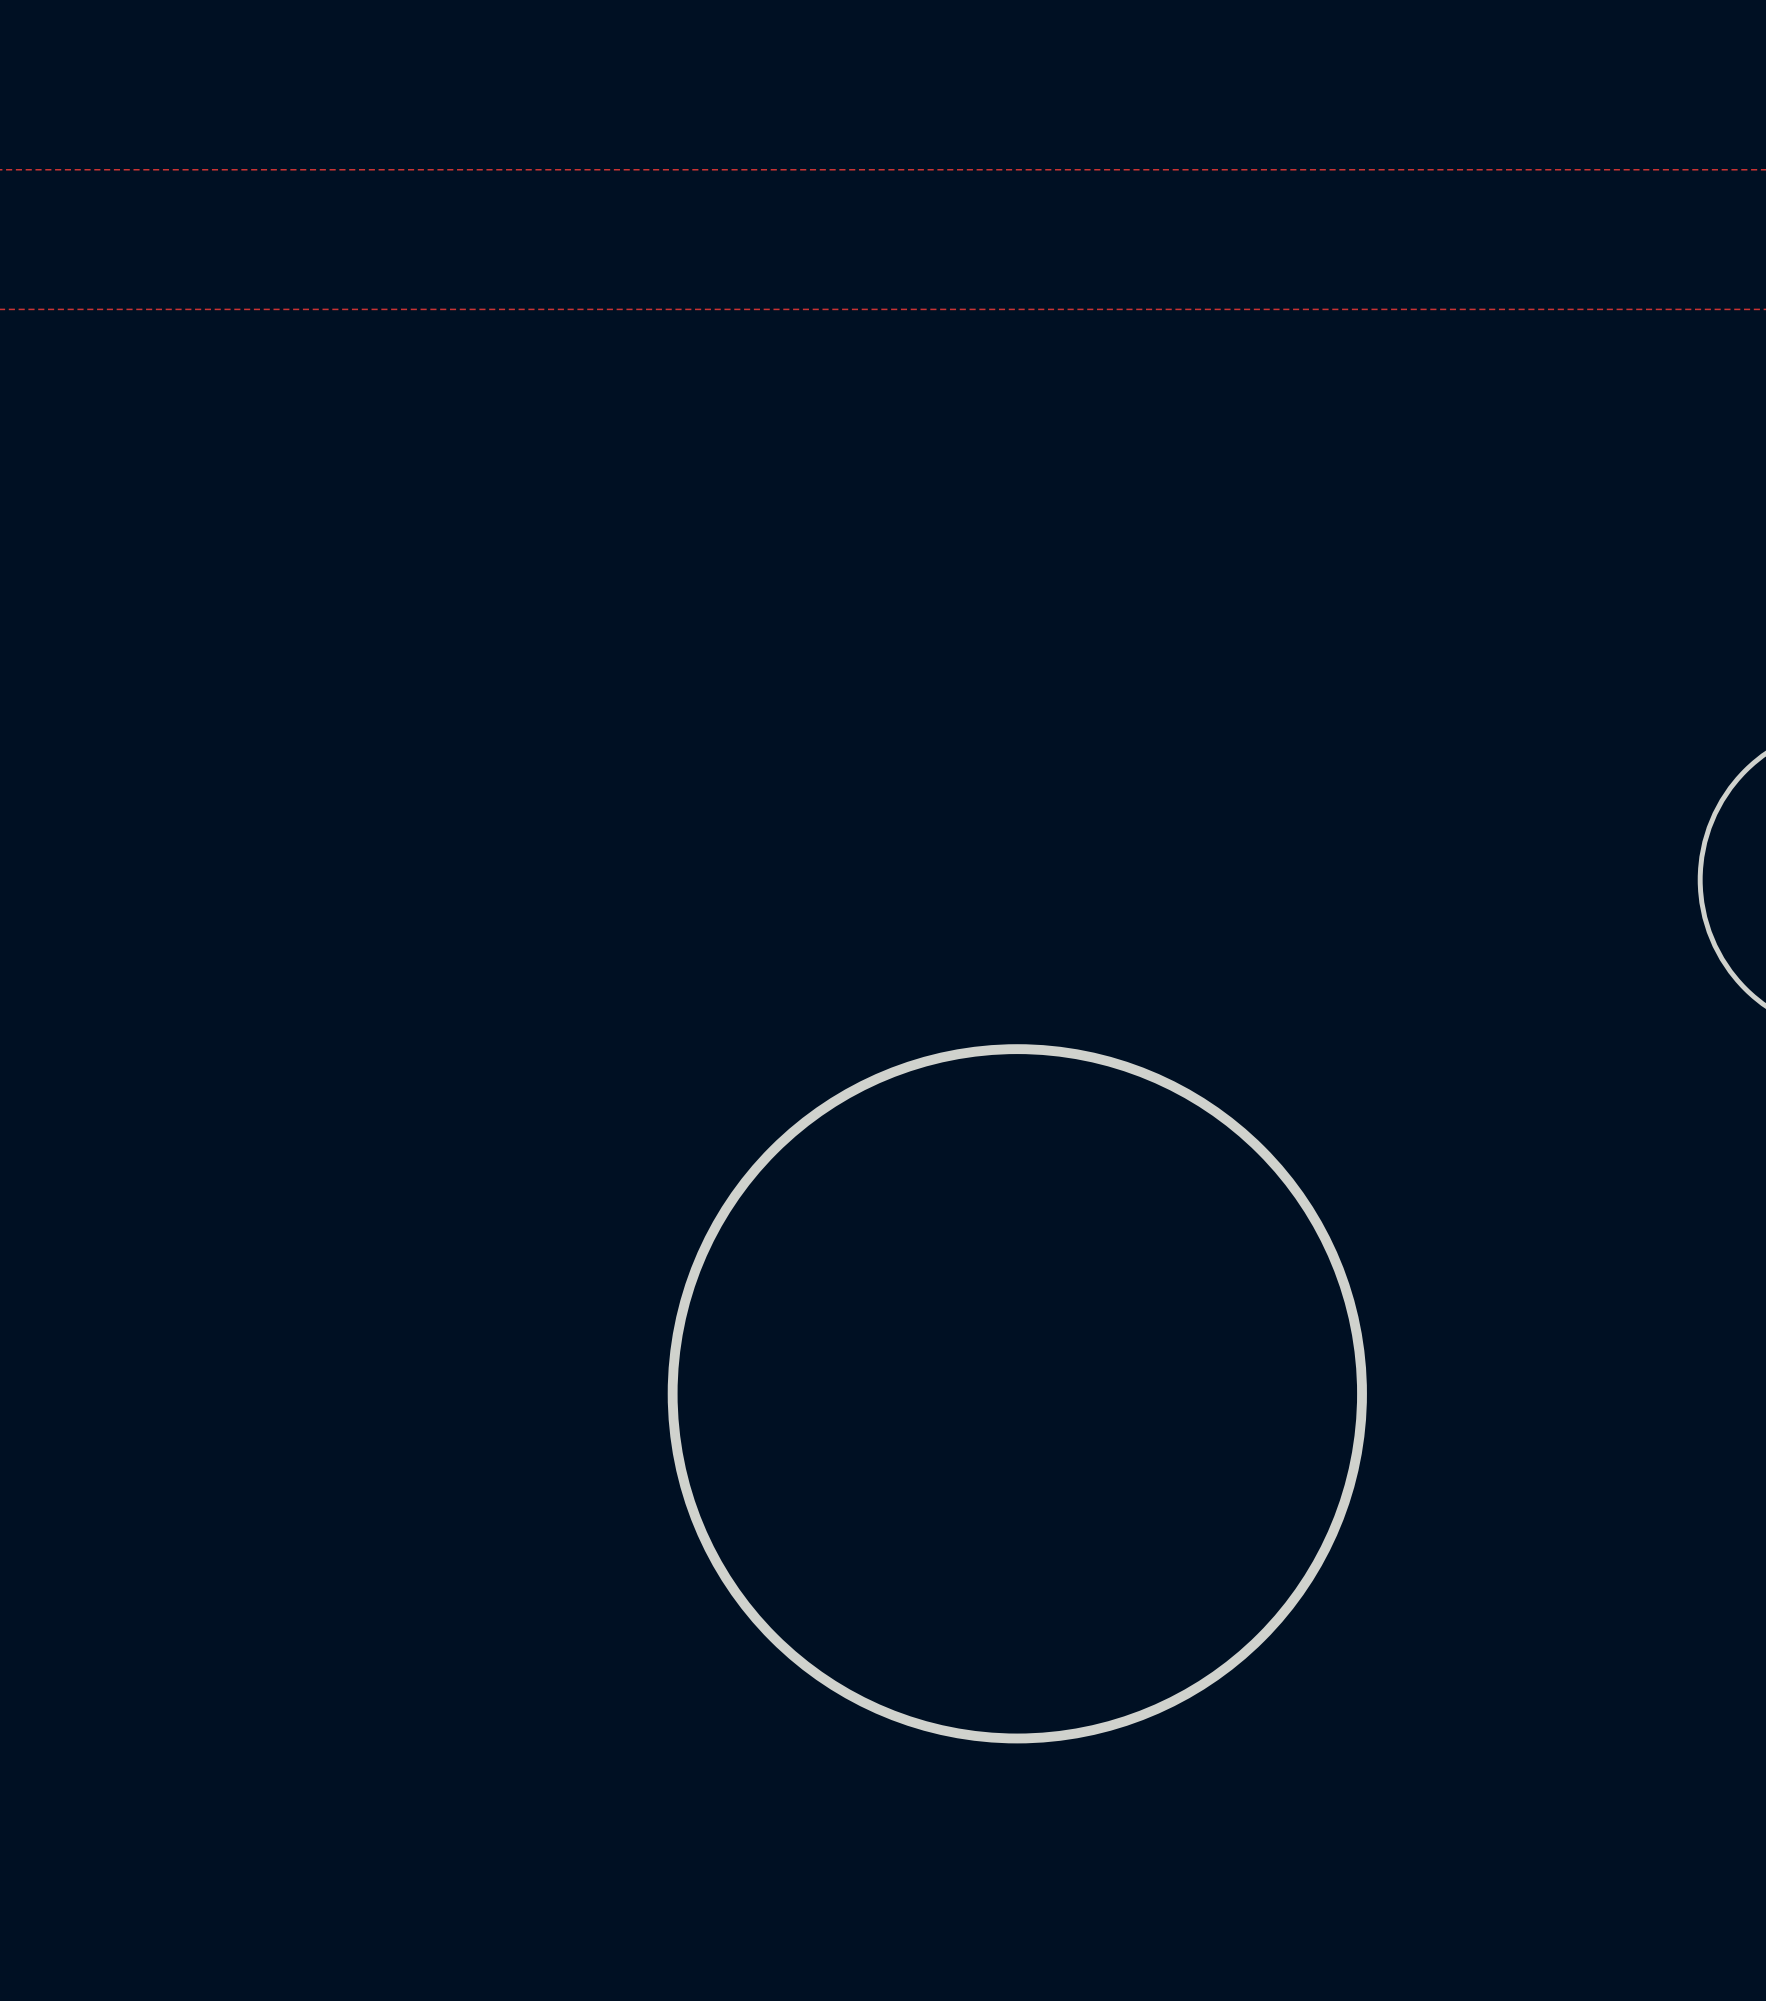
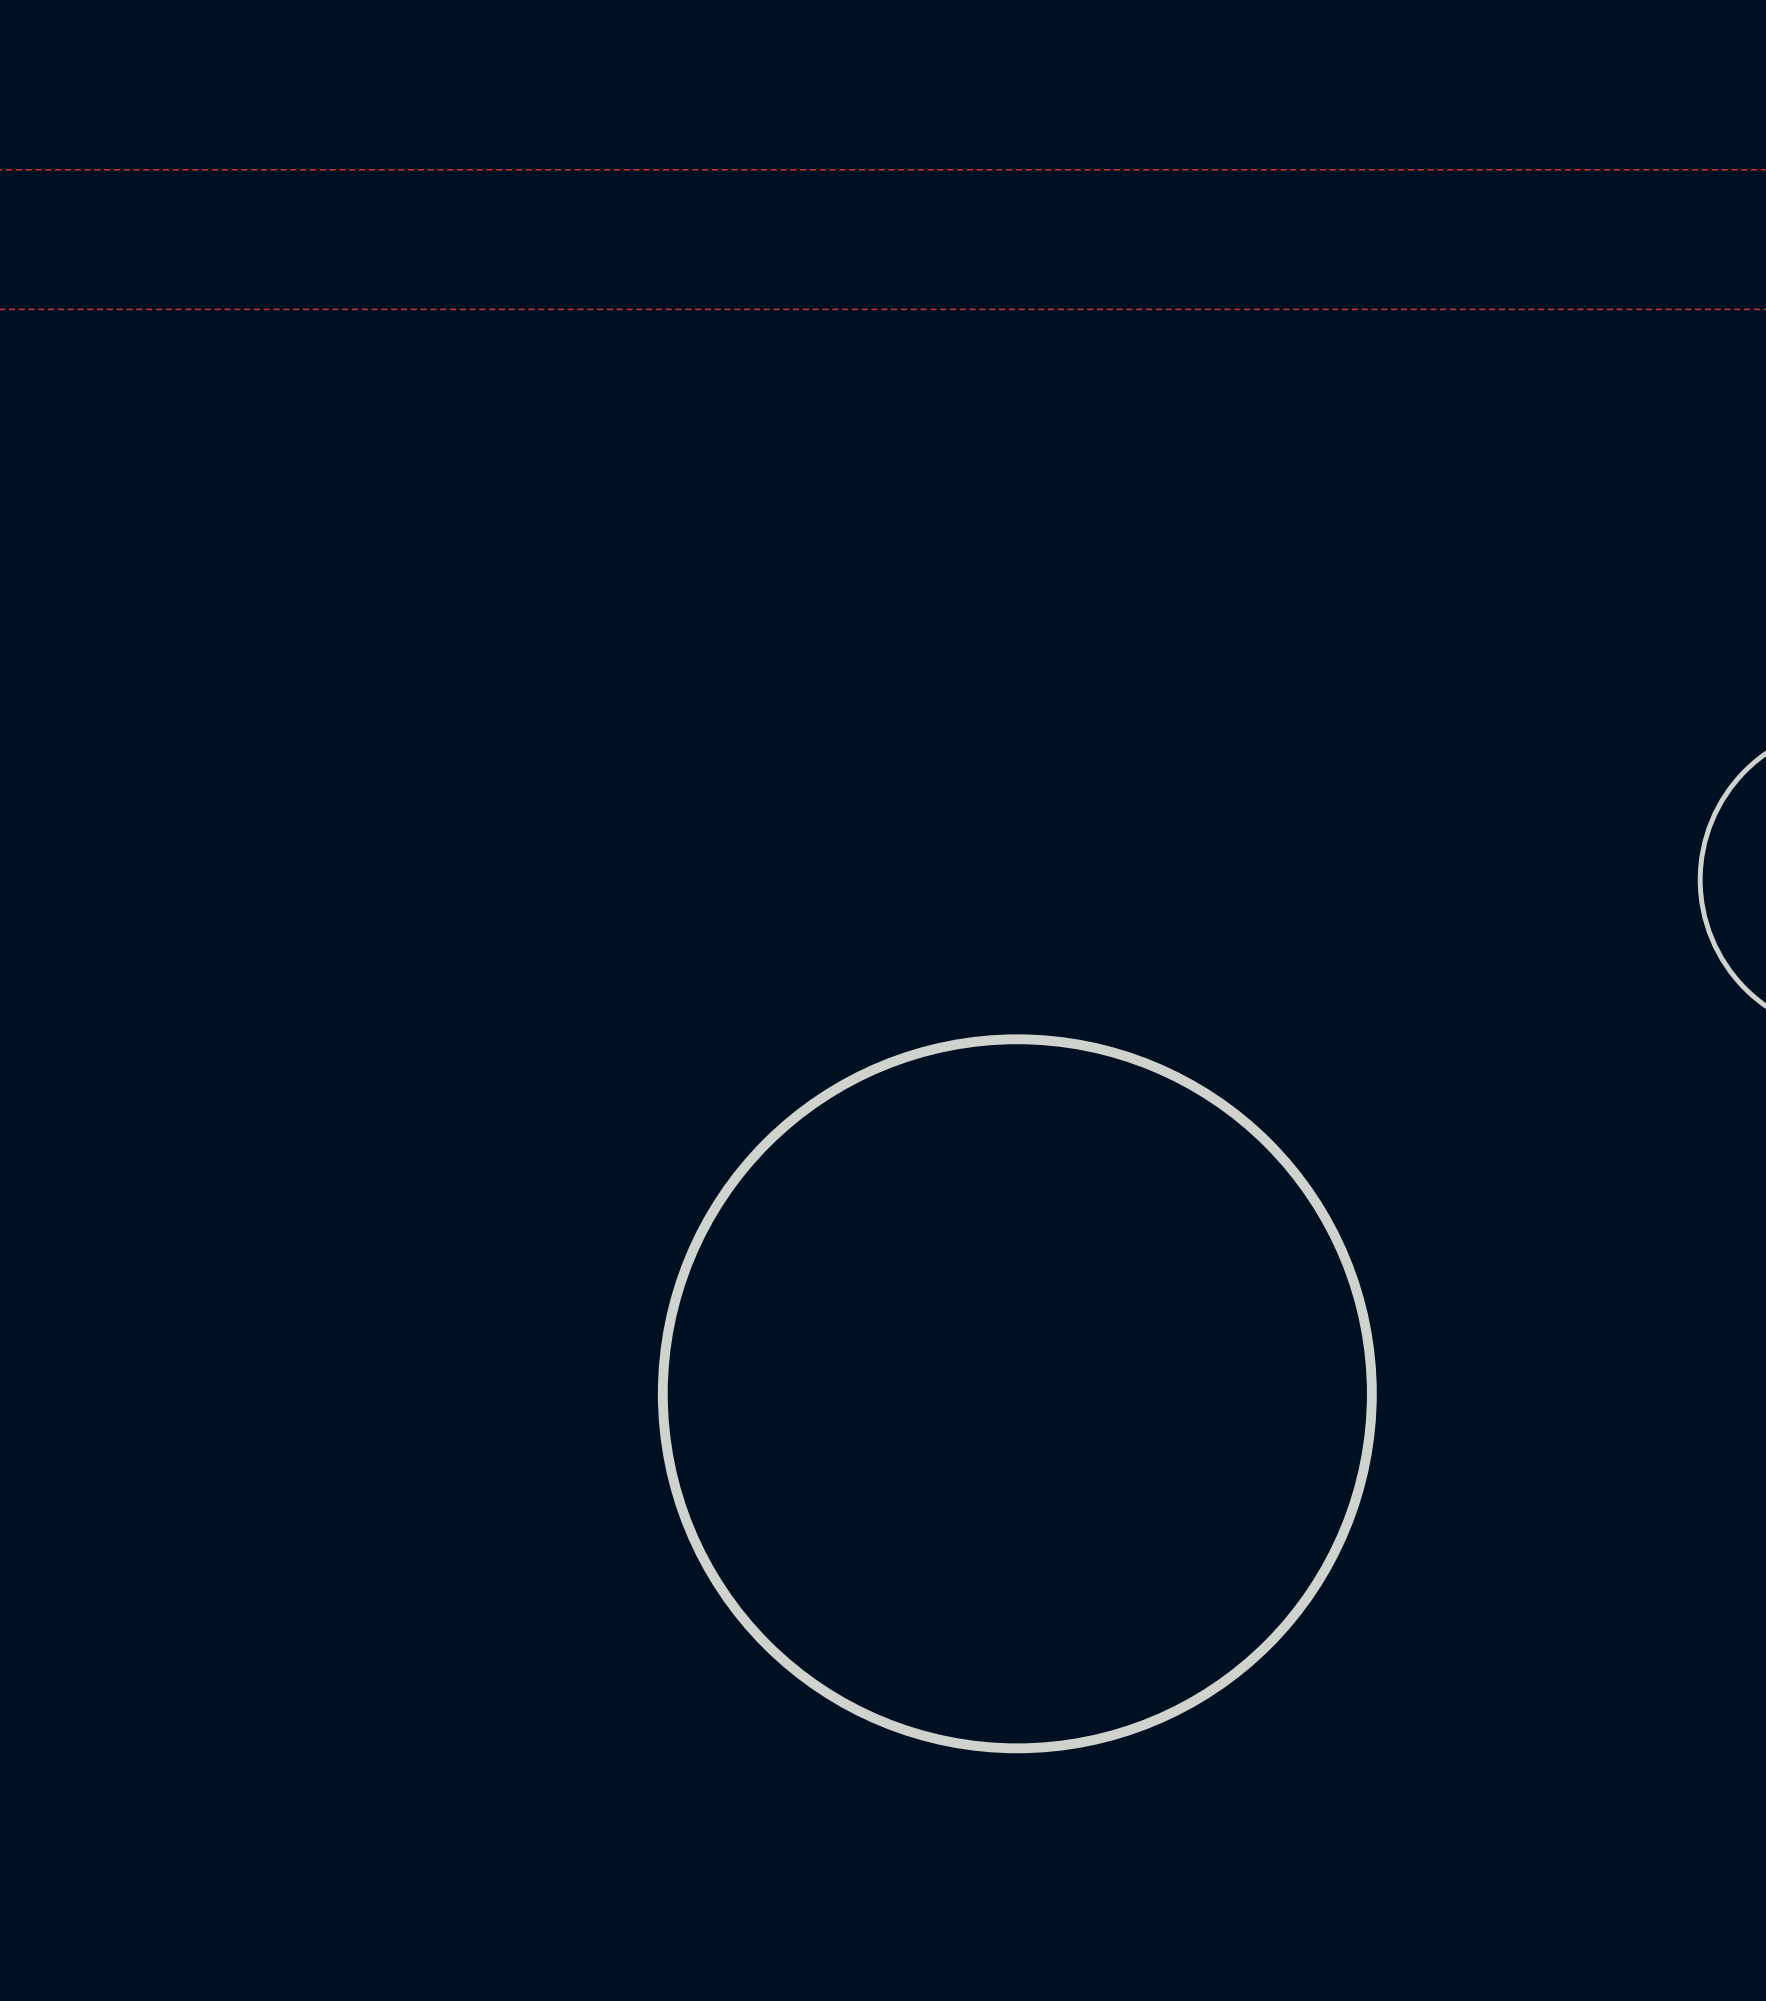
round board edge size: [667, 1044, 1367, 1744] -> [657, 1034, 1377, 1754]

